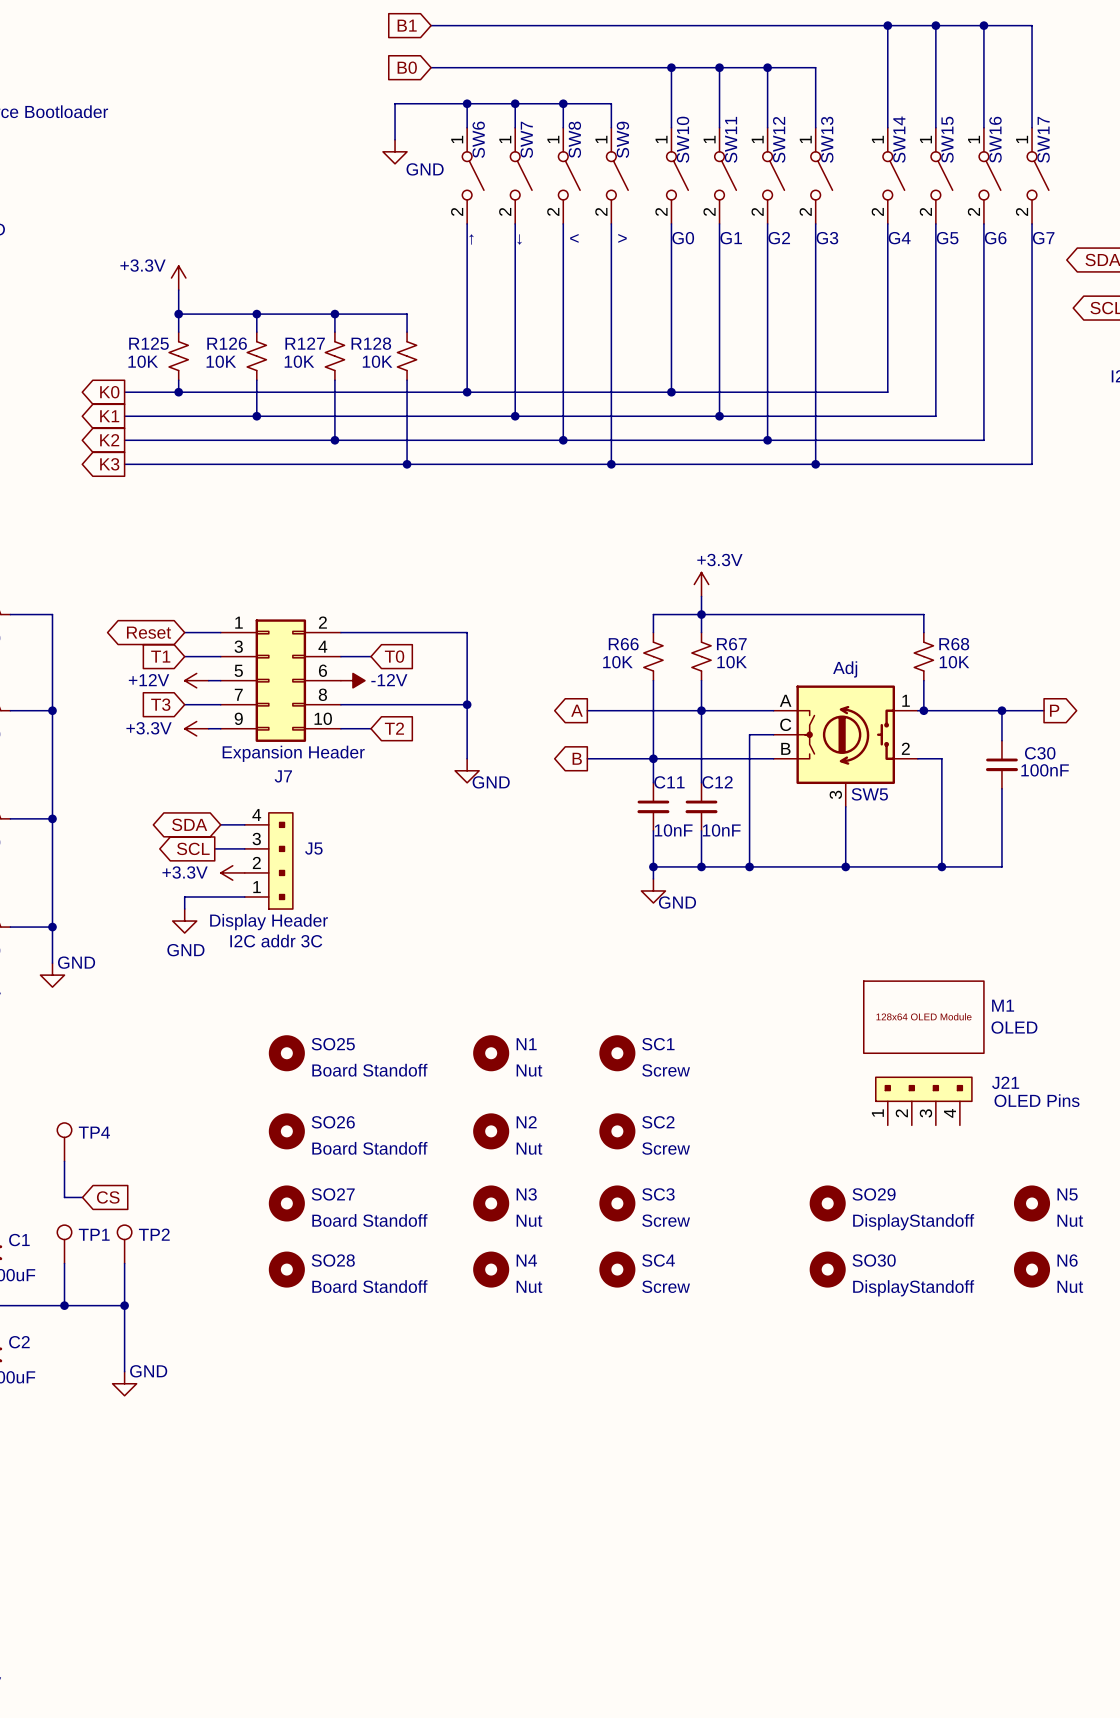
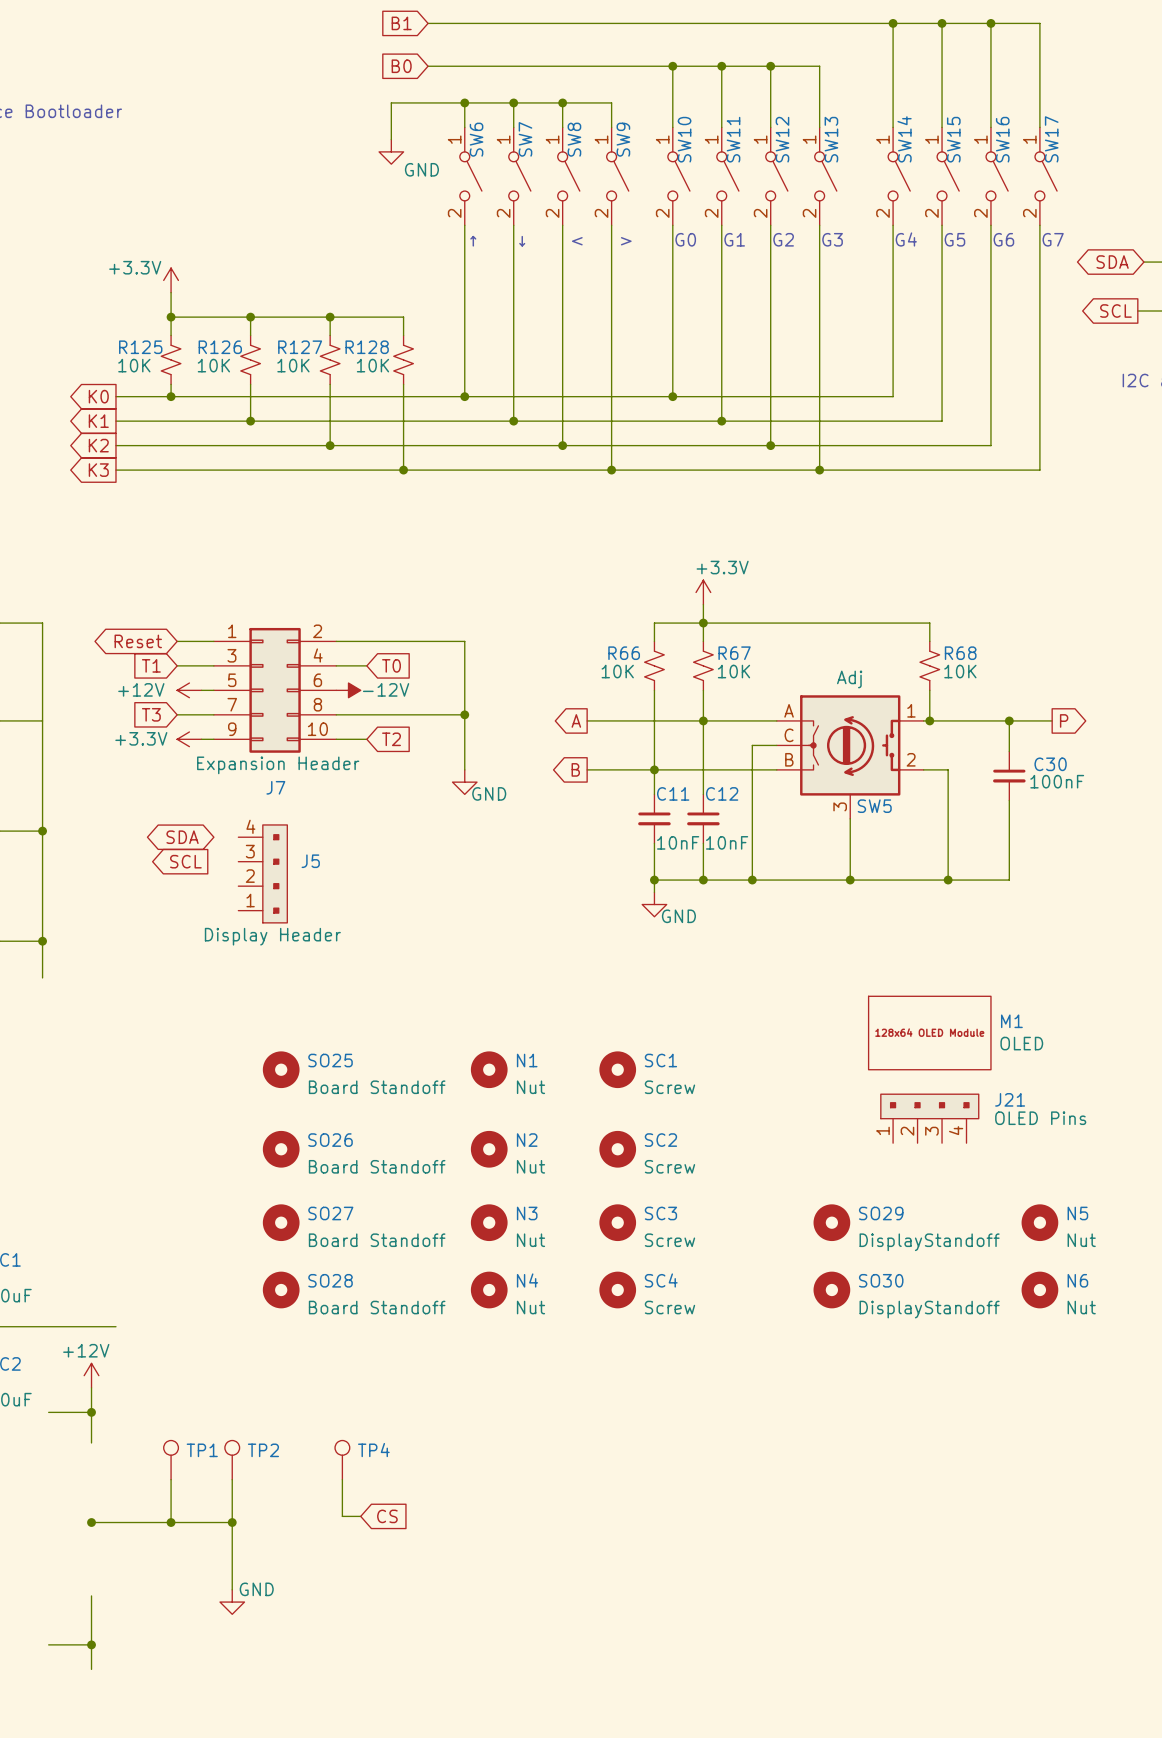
junction: (52, 710) -> none
wire: (220, 824) (244, 824) -> none
wire: (214, 848) (244, 848) -> none
power symbol: +3.3V (232, 872) -> none
wire: (244, 896) (184, 896) (184, 909) -> none
power symbol: GND (184, 921) -> none
text: I2C addr 3C (276, 941) -> none
power symbol: GND (52, 975) -> none
TP4 position: (64, 1142) -> (342, 1460)
wire: (64, 1161) (64, 1197) (82, 1197) -> none
global label: CS (108, 1197) -> none
TP1 position: (64, 1244) -> (171, 1460)
TP2 position: (124, 1244) -> (232, 1460)
wire: (64, 1263) (64, 1305) -> (171, 1479) (171, 1522)
wire: (124, 1263) (124, 1371) -> (232, 1479) (232, 1589)
junction: (64, 1305) -> none
junction: (124, 1305) -> none
power symbol: none -> +12V (91, 1375)
wire: none -> (91, 1387) (91, 1442)
power symbol: GND (124, 1383) -> none
wire: none -> (48, 1412) (91, 1412)
junction: none -> (91, 1412)
wire: none -> (342, 1479) (342, 1516) (360, 1516)
global label: none -> CS (387, 1516)
wire: none -> (91, 1522) (232, 1522)
junction: none -> (91, 1522)
junction: none -> (171, 1522)
junction: none -> (232, 1522)
wire: none -> (91, 1595) (91, 1669)
power symbol: none -> GND (232, 1602)
wire: none -> (48, 1644) (91, 1644)
junction: none -> (91, 1644)

